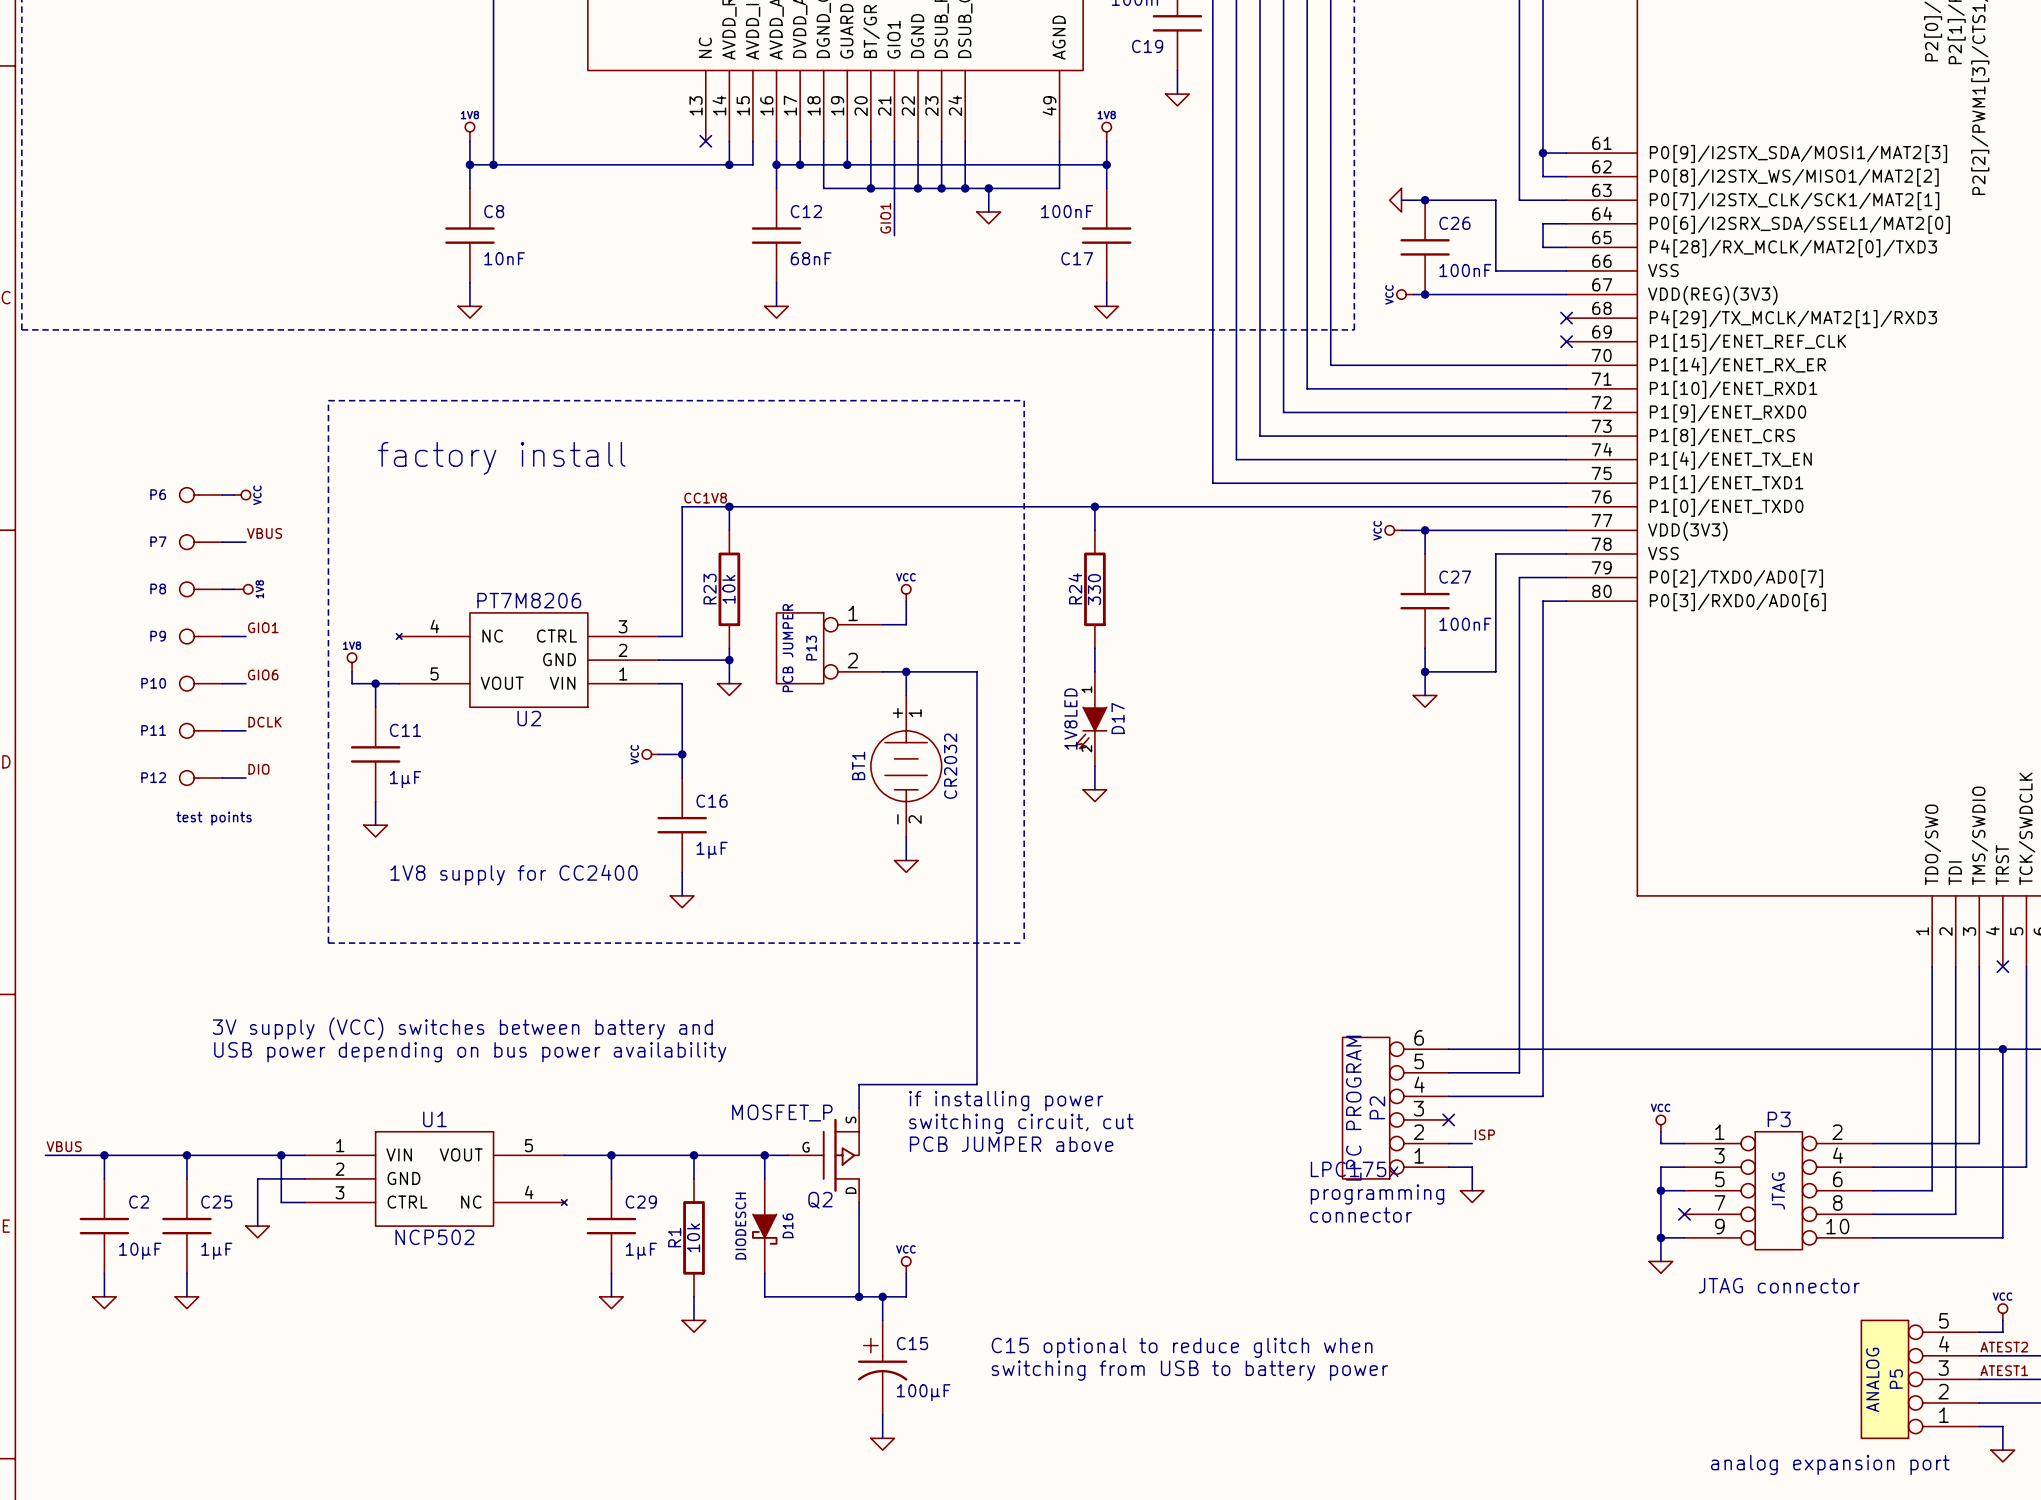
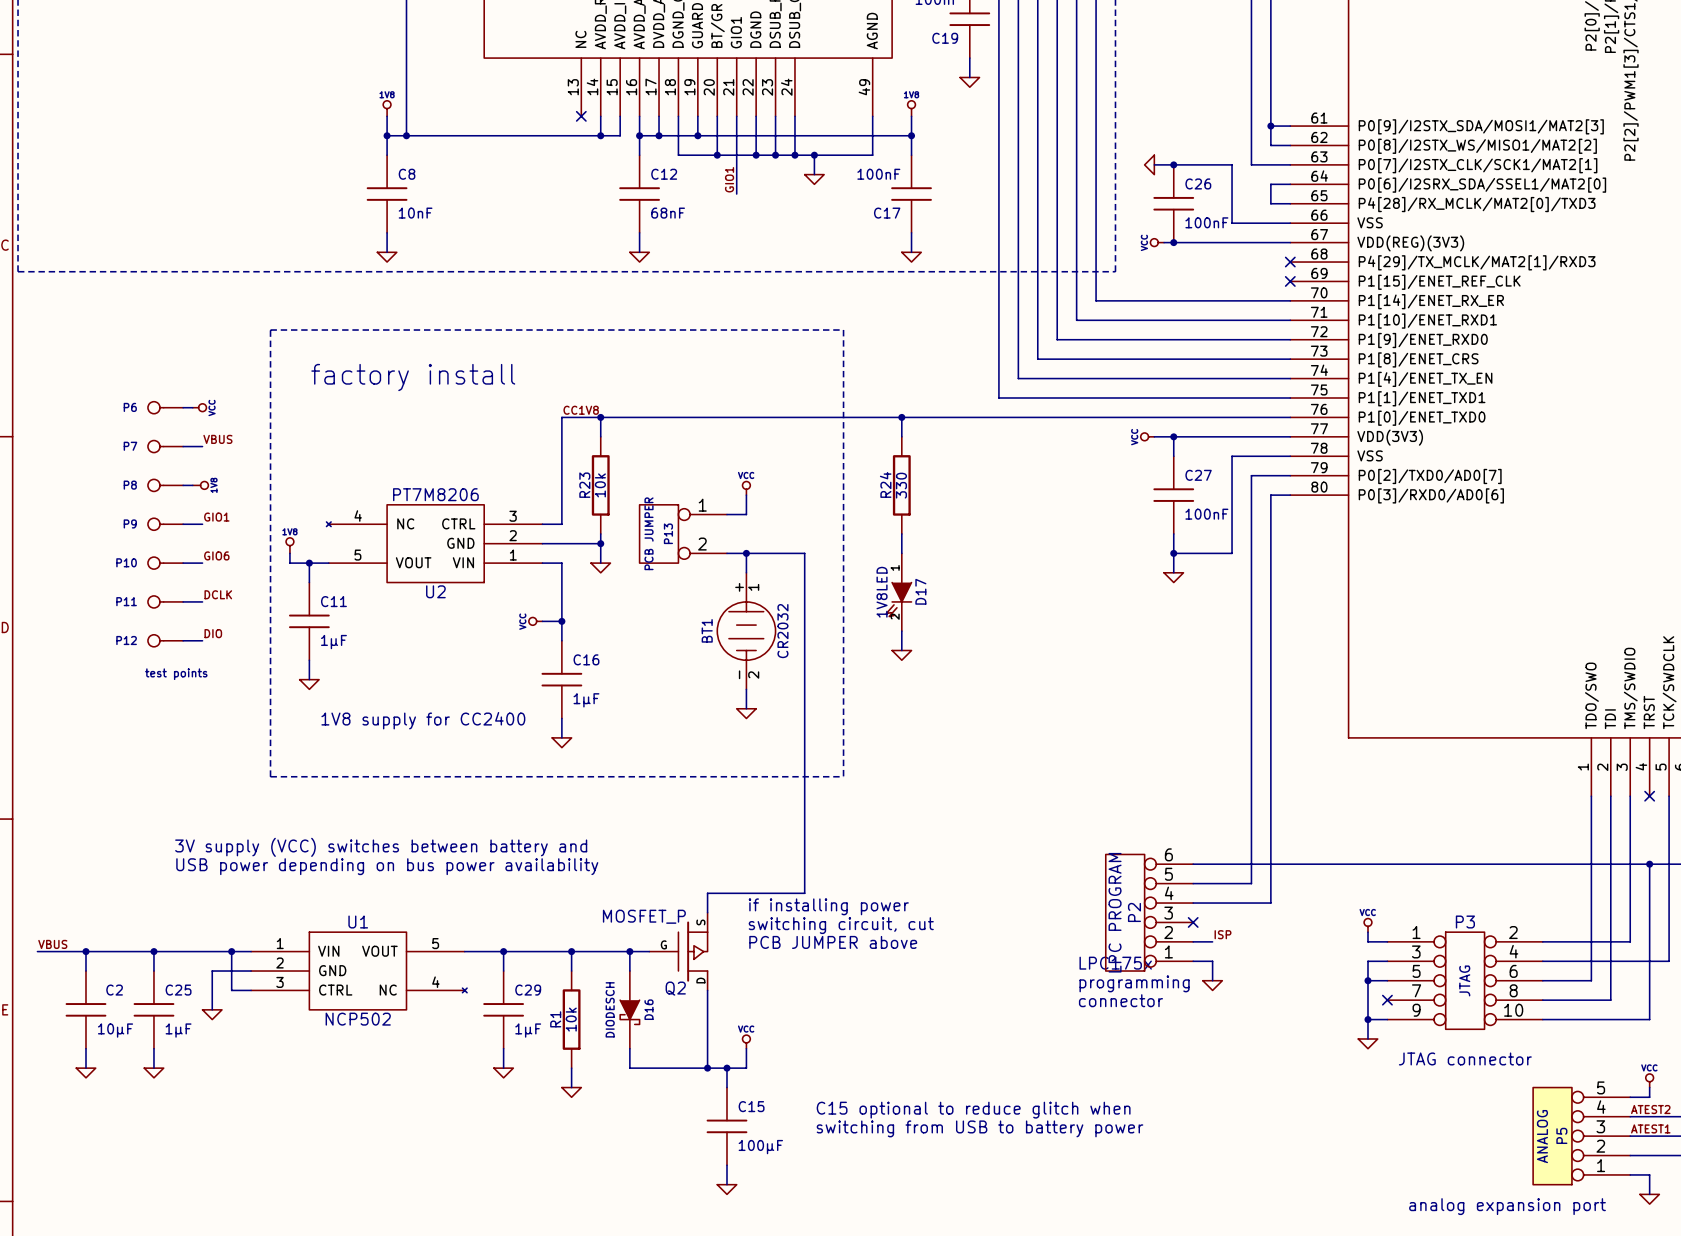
C15 symbol: [857, 1320, 908, 1415] -> [706, 1087, 748, 1166]

